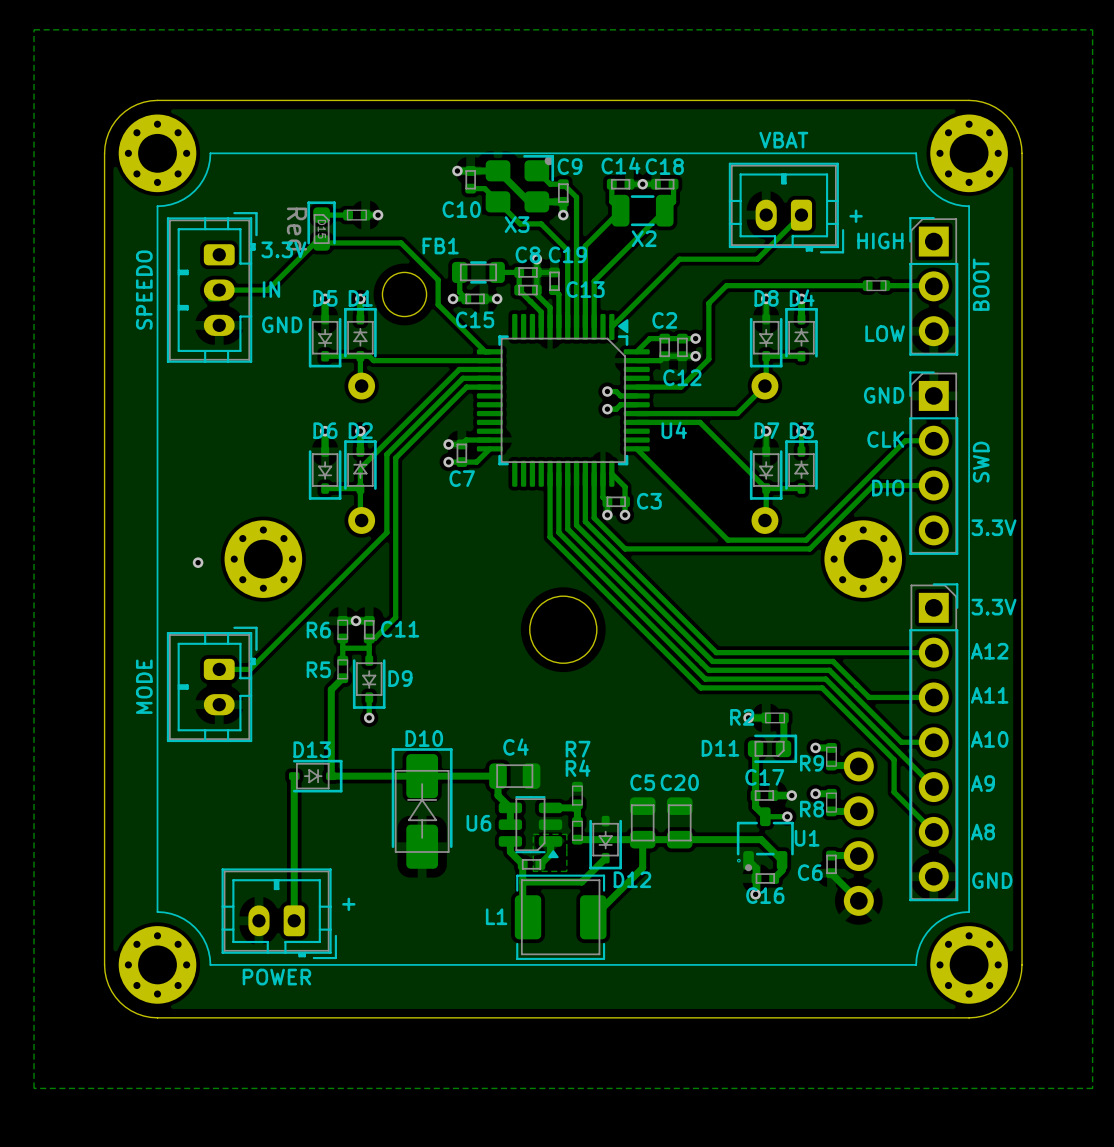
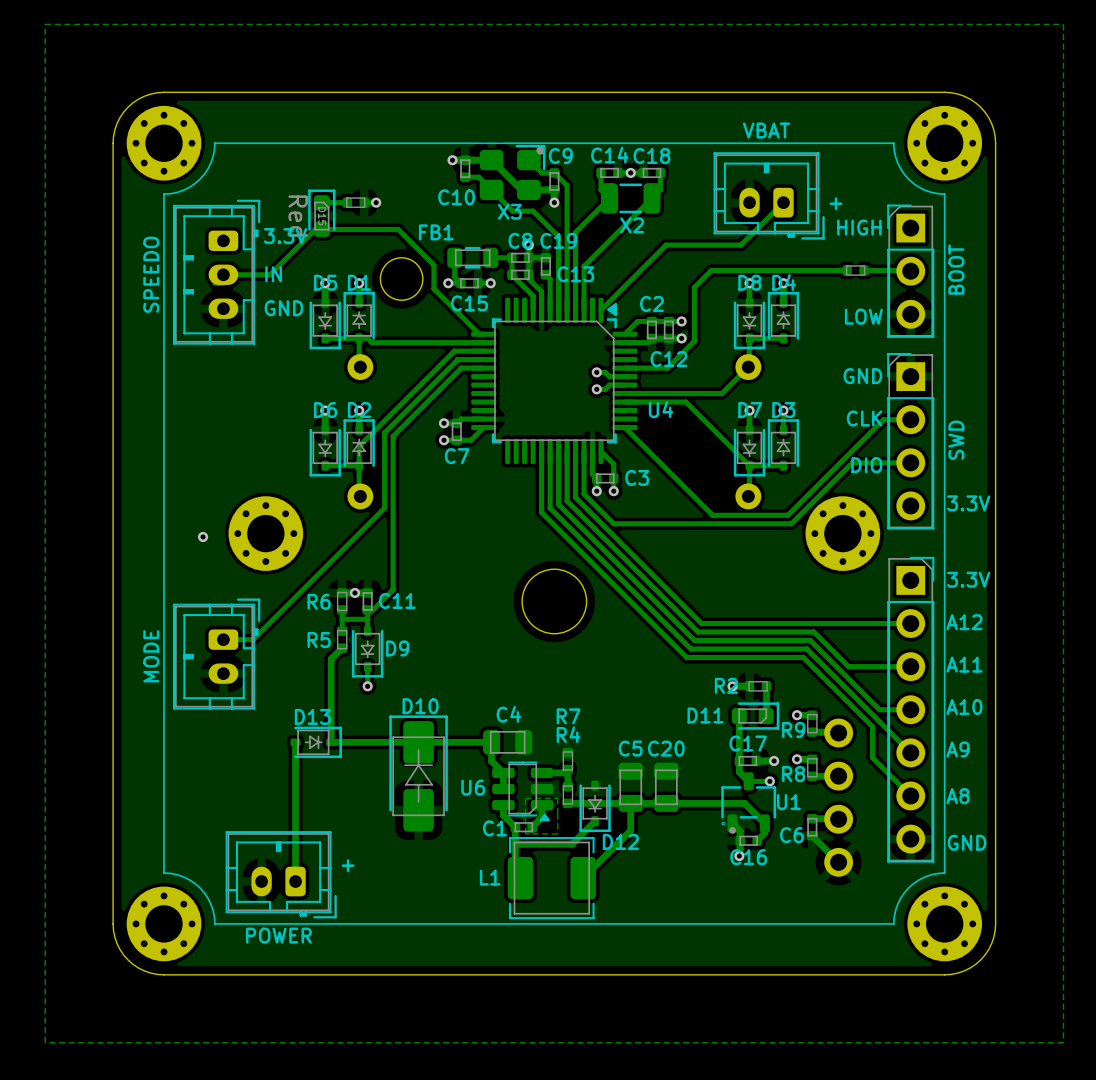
C1 name: none -> C1 (494, 828)

